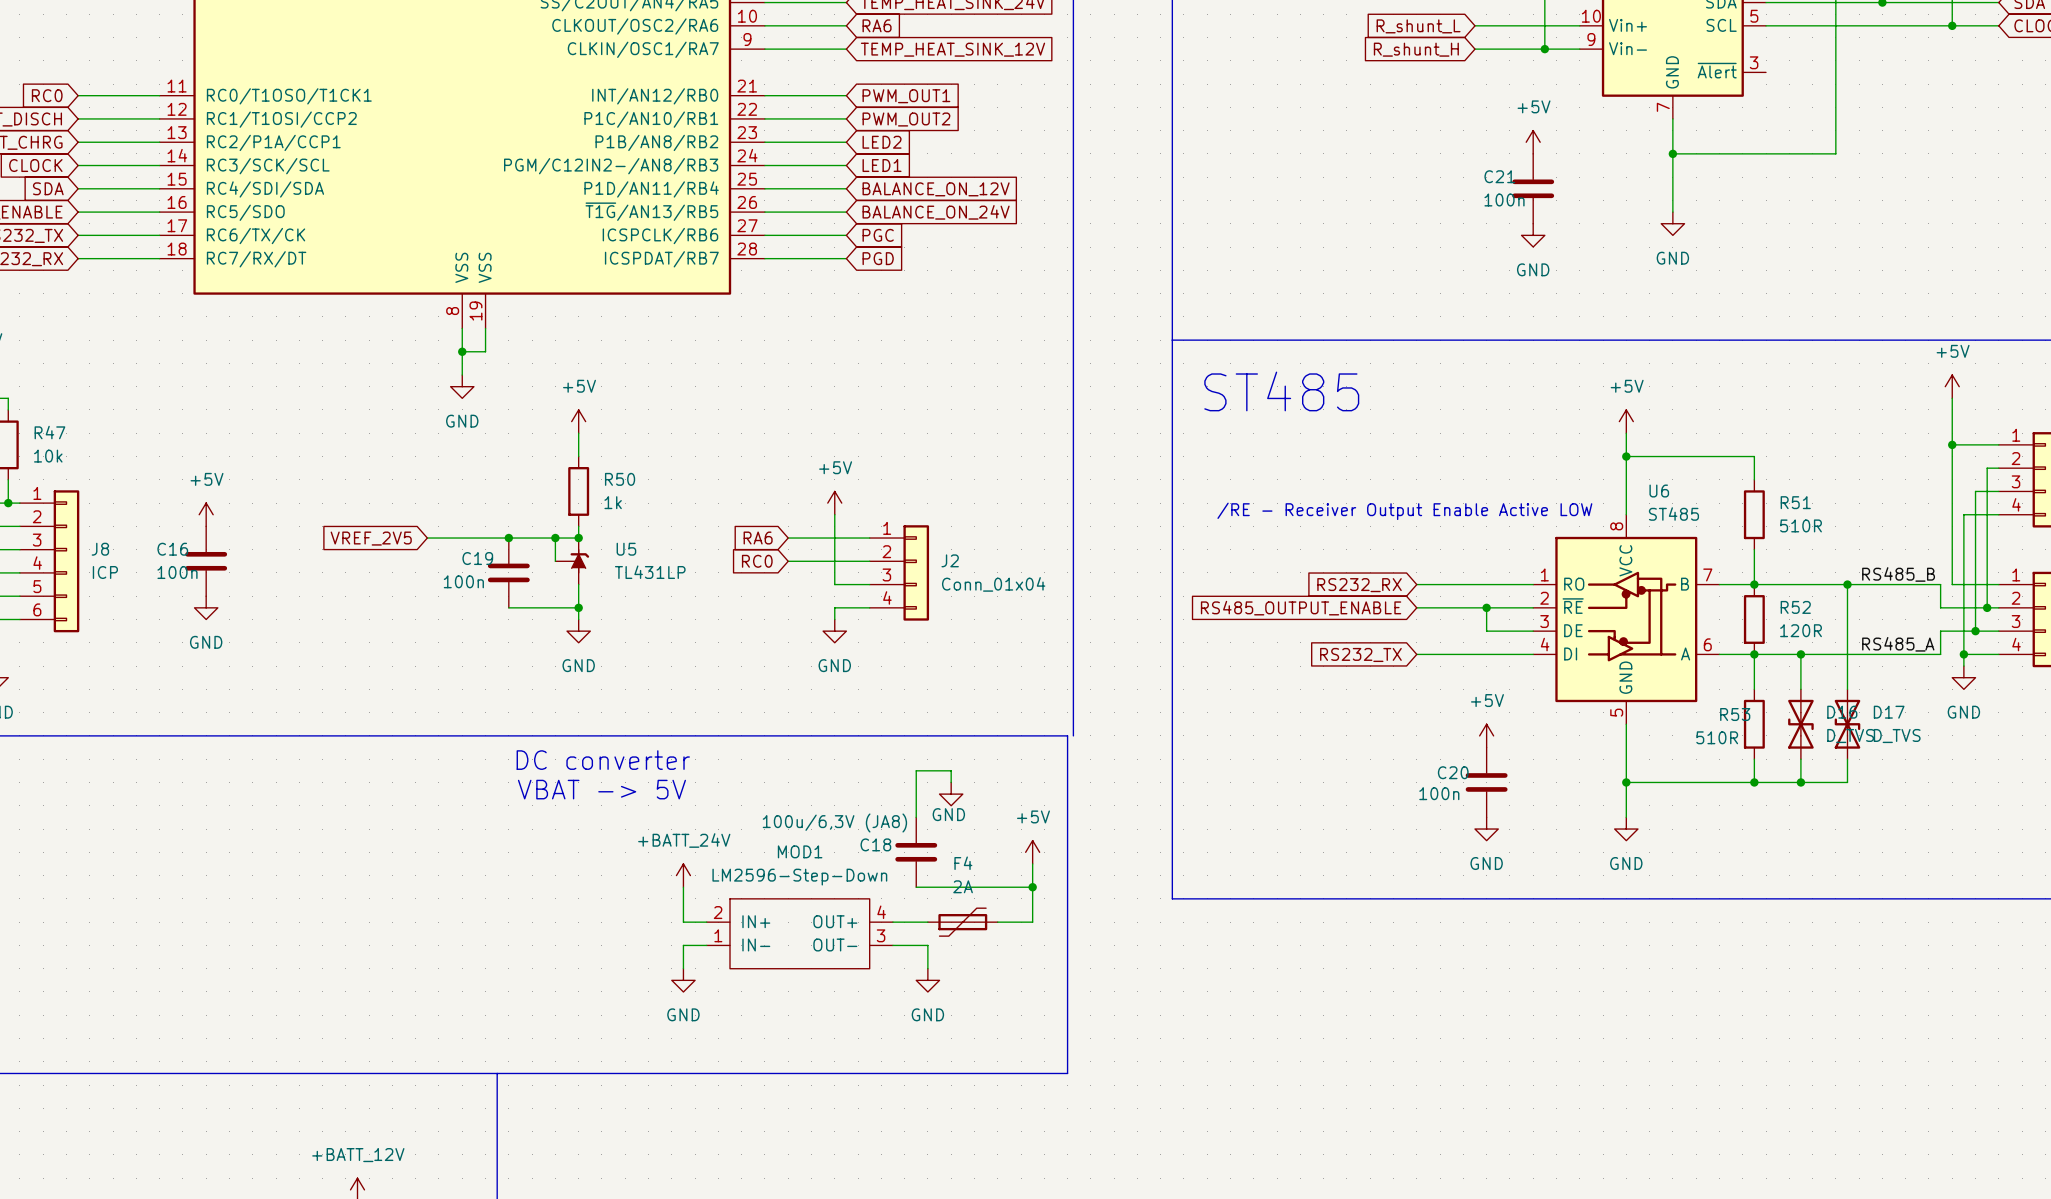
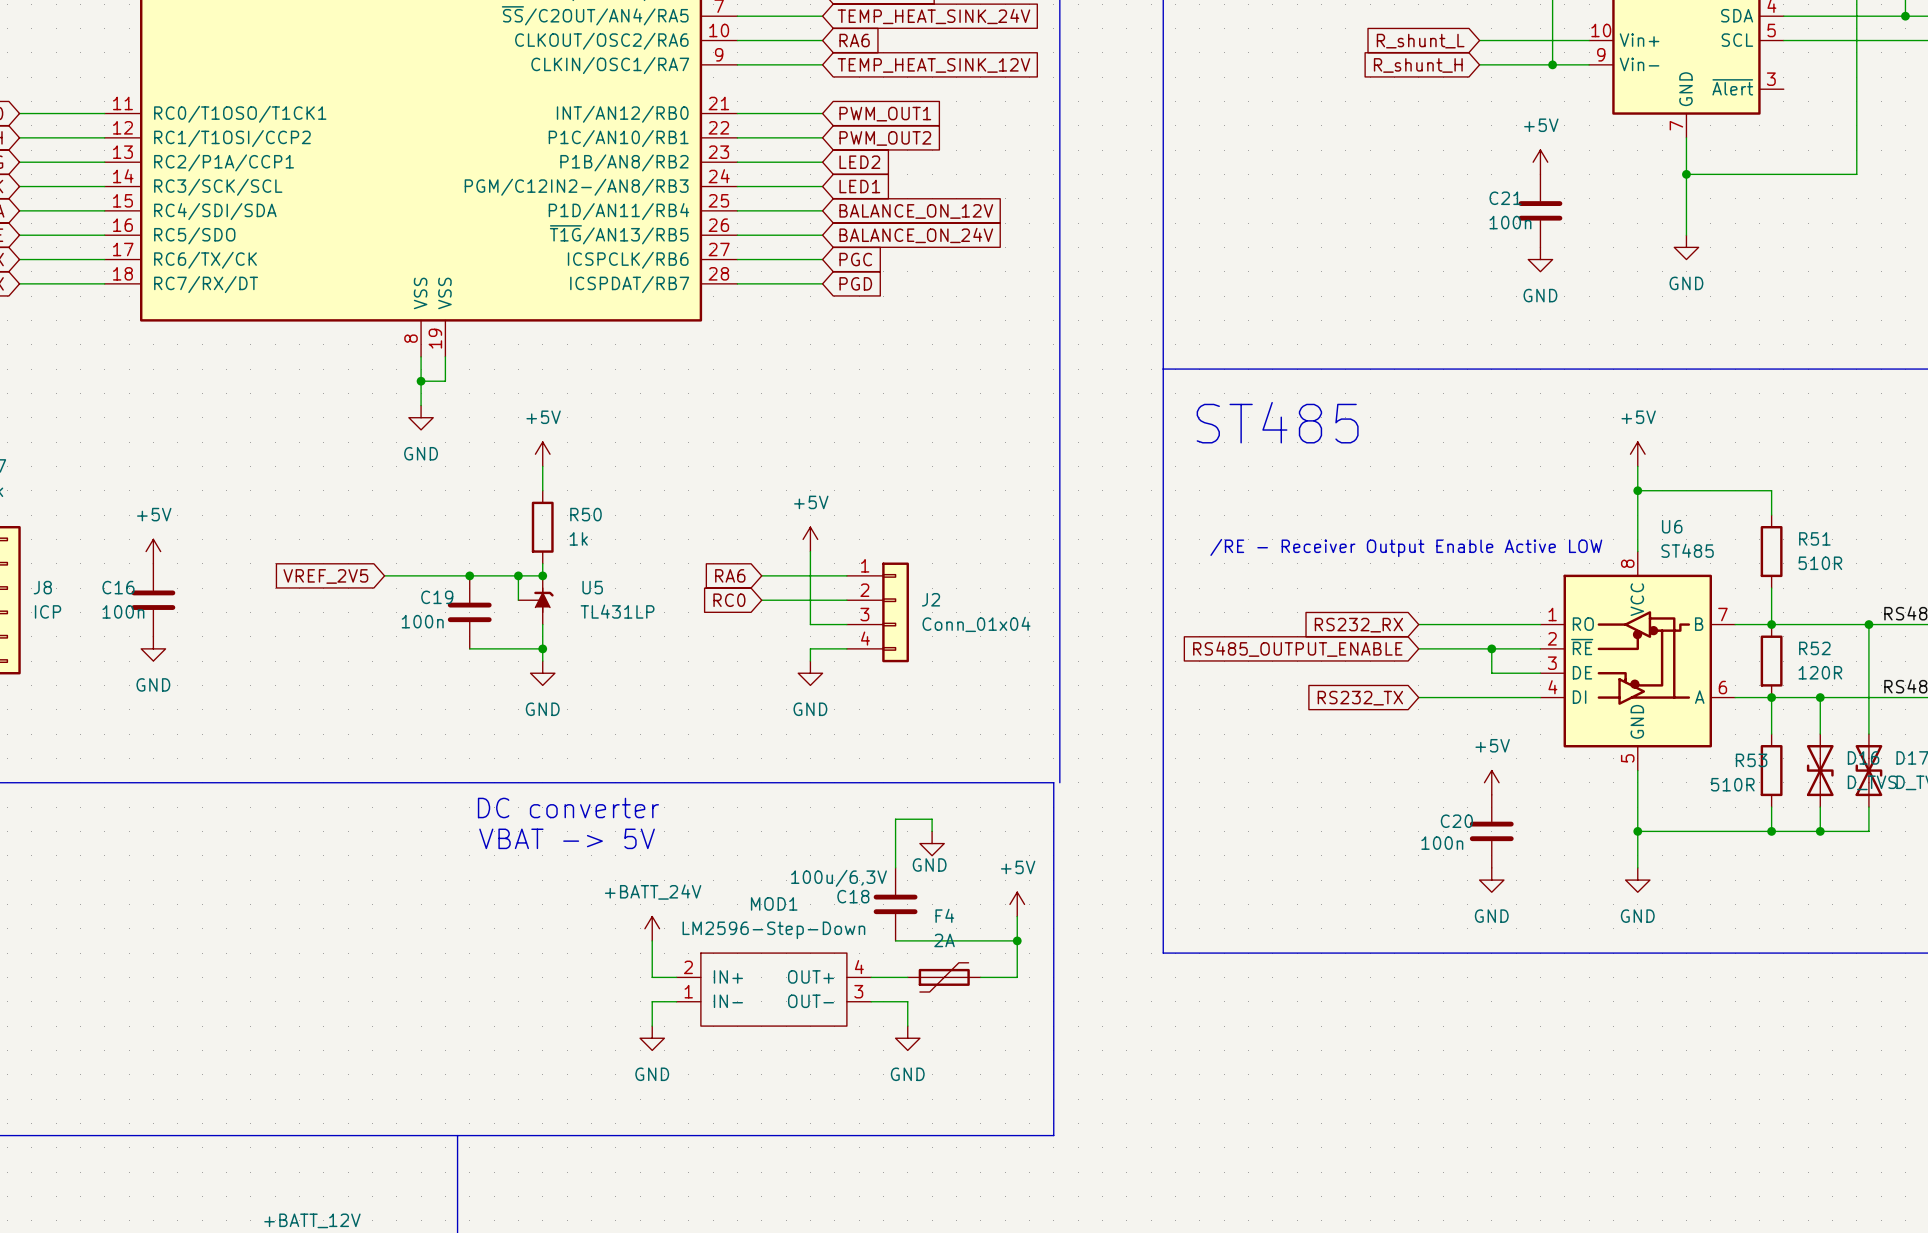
C18 value: 100u/6,3V (JA8) (834, 822) -> 100u/6,3V (839, 878)

